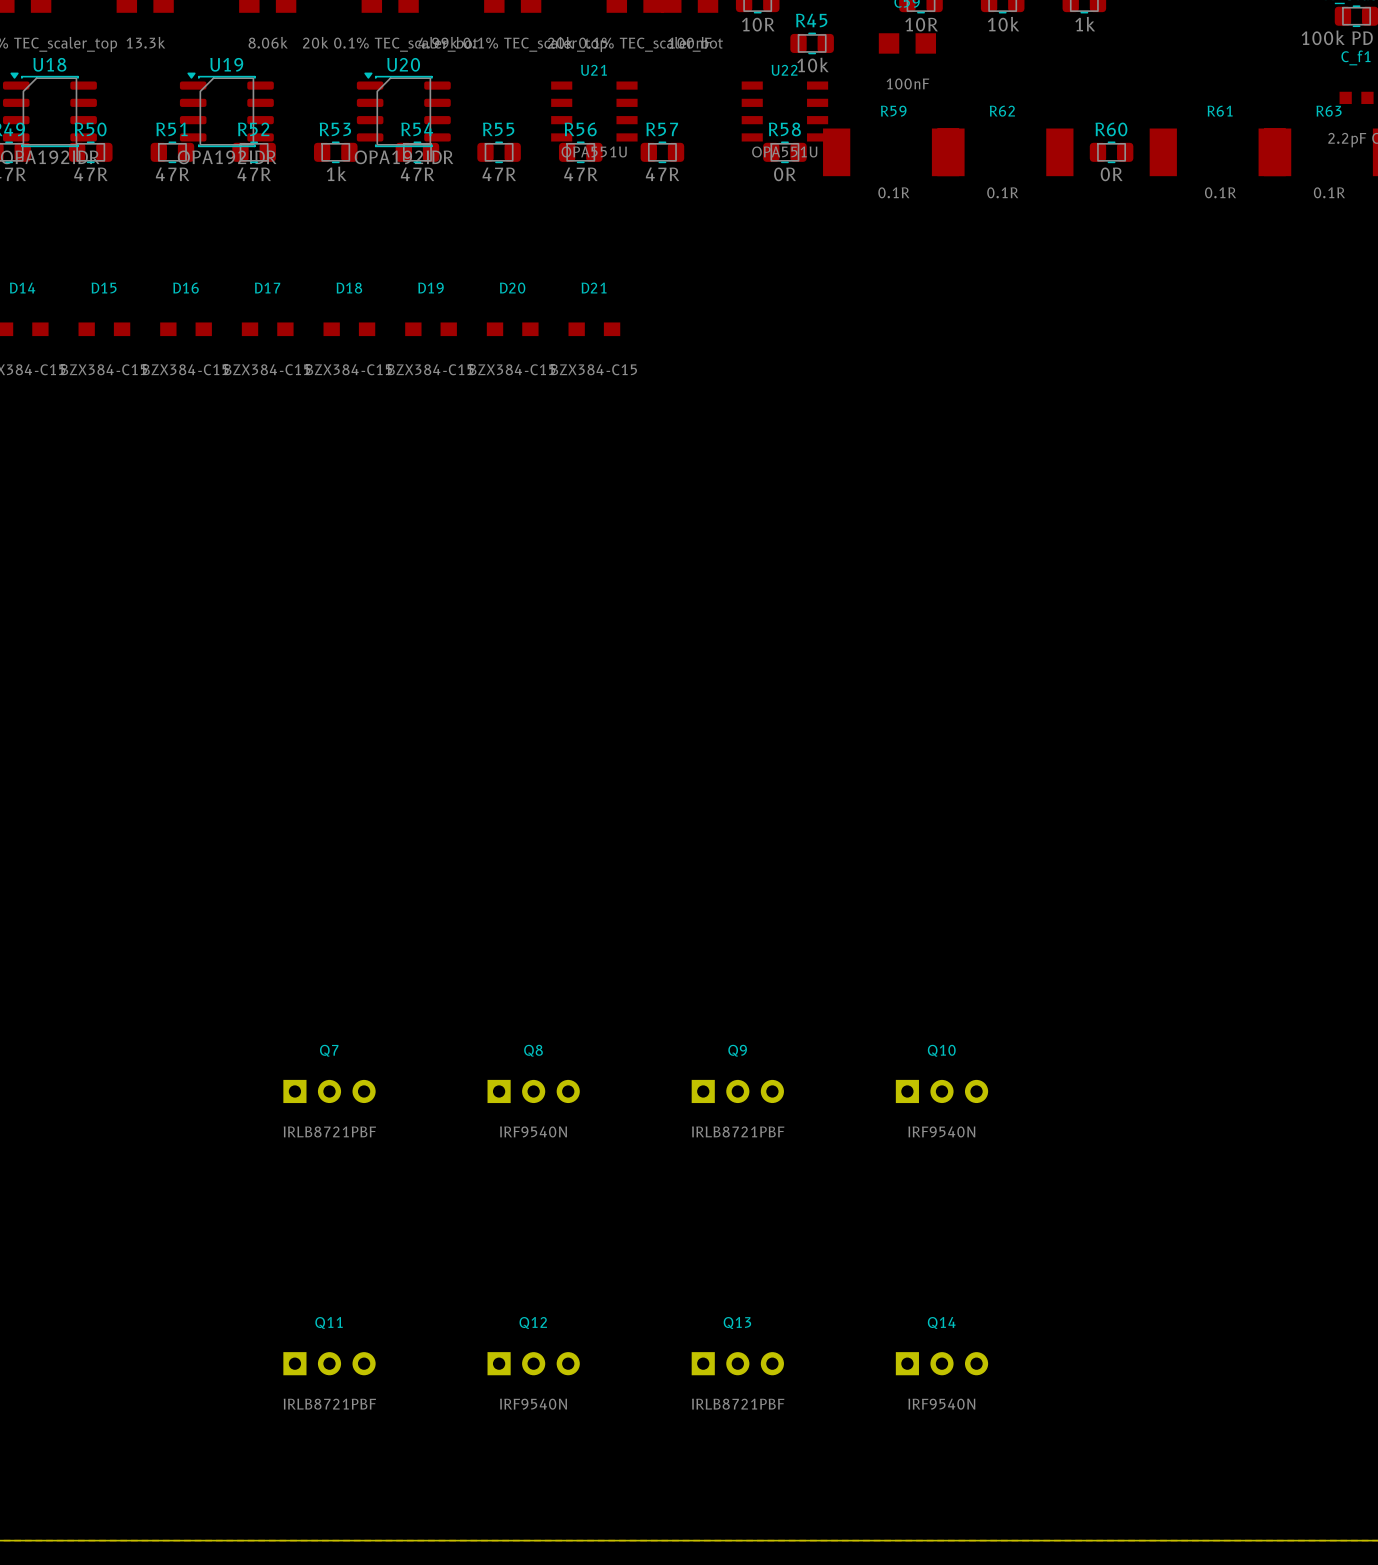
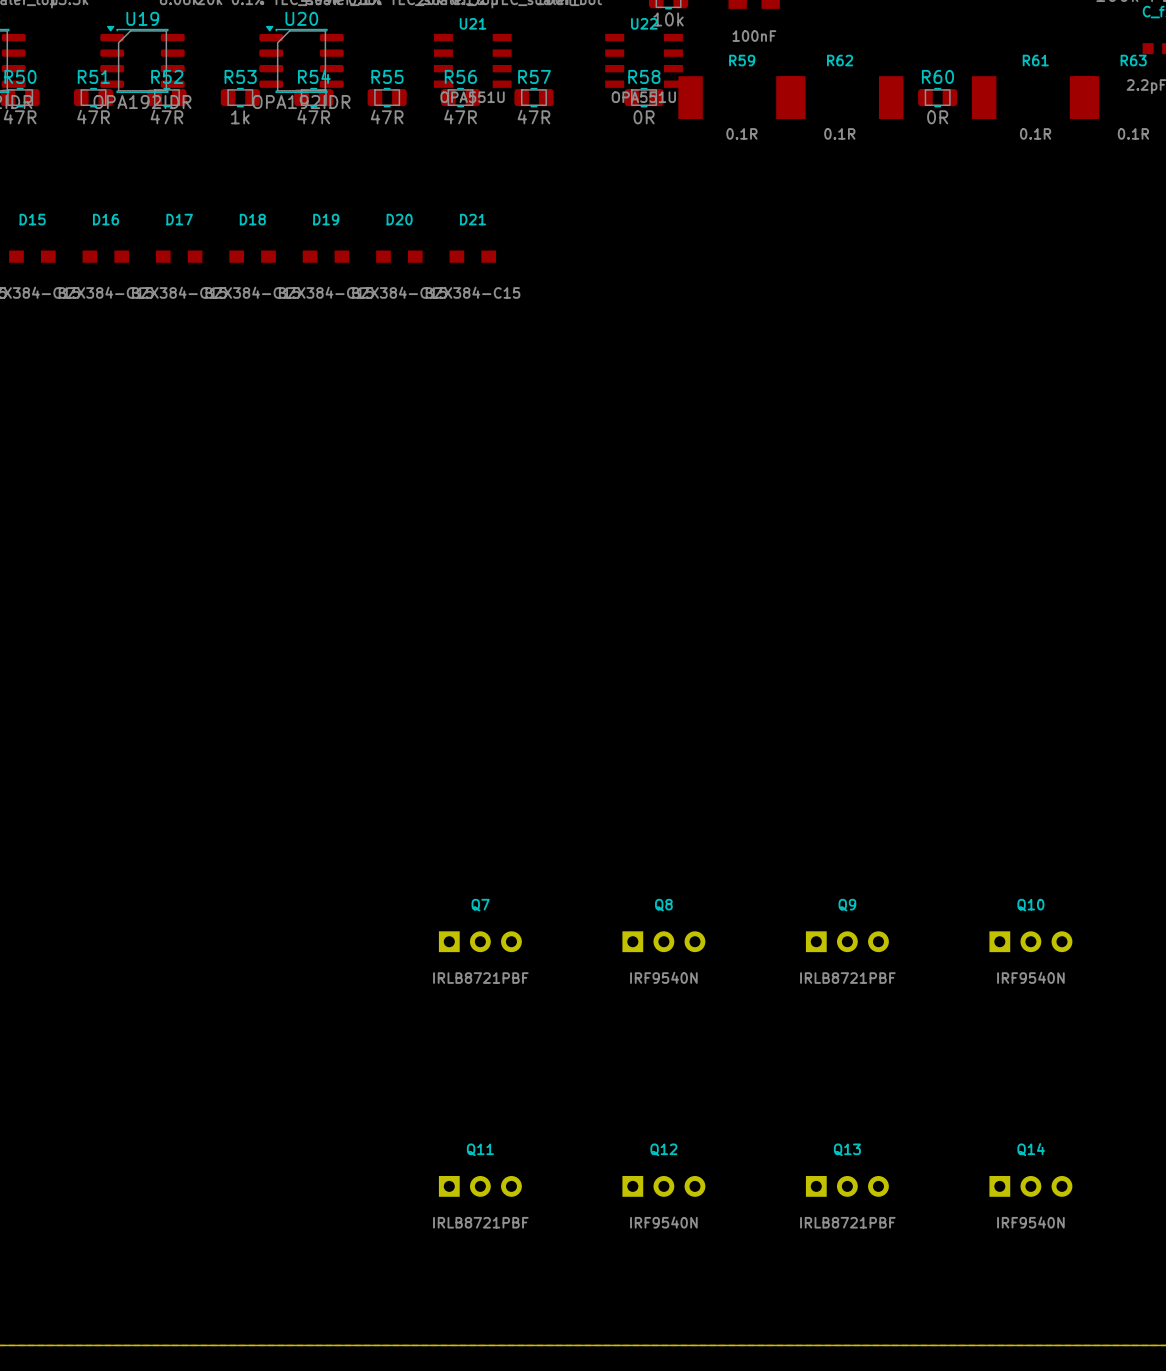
Q7 position: (329, 1091) -> (480, 941)
Q8 position: (533, 1091) -> (663, 941)
Q9 position: (737, 1091) -> (847, 941)
Q10 position: (941, 1091) -> (1030, 941)
Q11 position: (329, 1363) -> (480, 1186)
Q12 position: (533, 1363) -> (663, 1186)
Q13 position: (737, 1363) -> (847, 1186)
Q14 position: (941, 1363) -> (1030, 1186)

